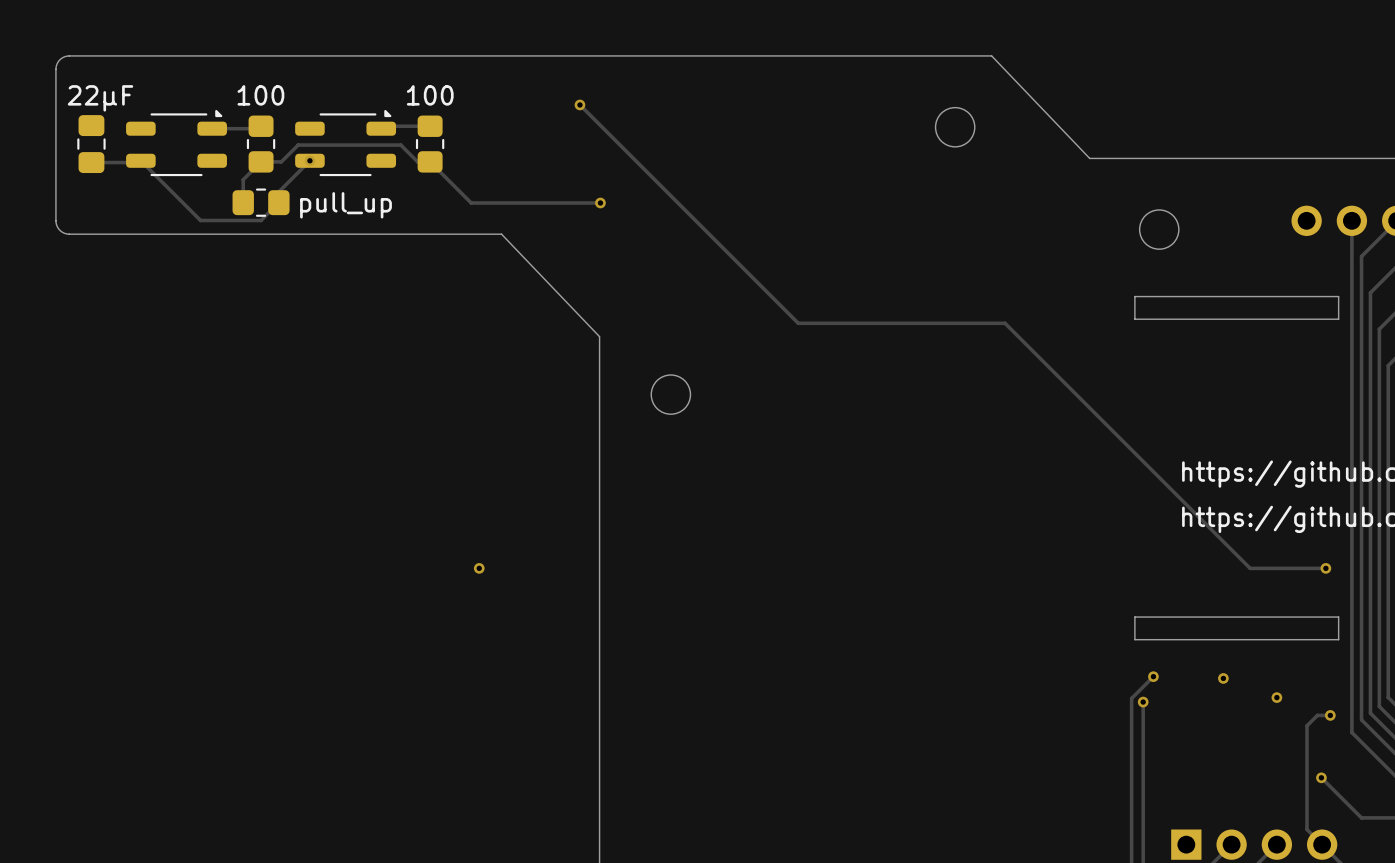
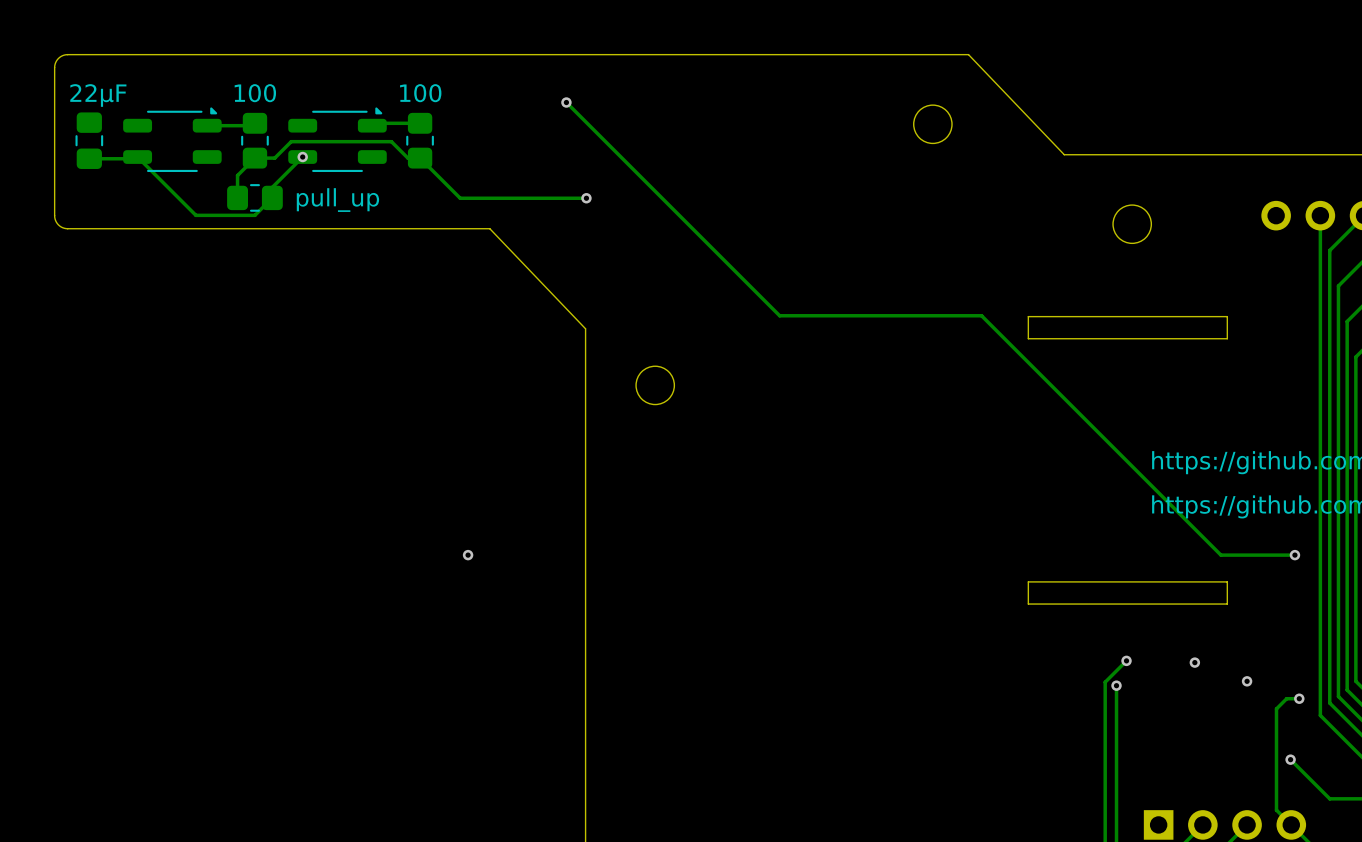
board edge: (1338, 296) (1338, 319) (1134, 319) (1134, 296) (1338, 296) -> (1227, 316) (1227, 338) (1028, 338) (1028, 316) (1227, 316)
board edge: (1338, 617) (1134, 617) (1134, 639) (1338, 639) (1338, 617) -> (1227, 581) (1028, 581) (1028, 604) (1227, 604) (1227, 581)

